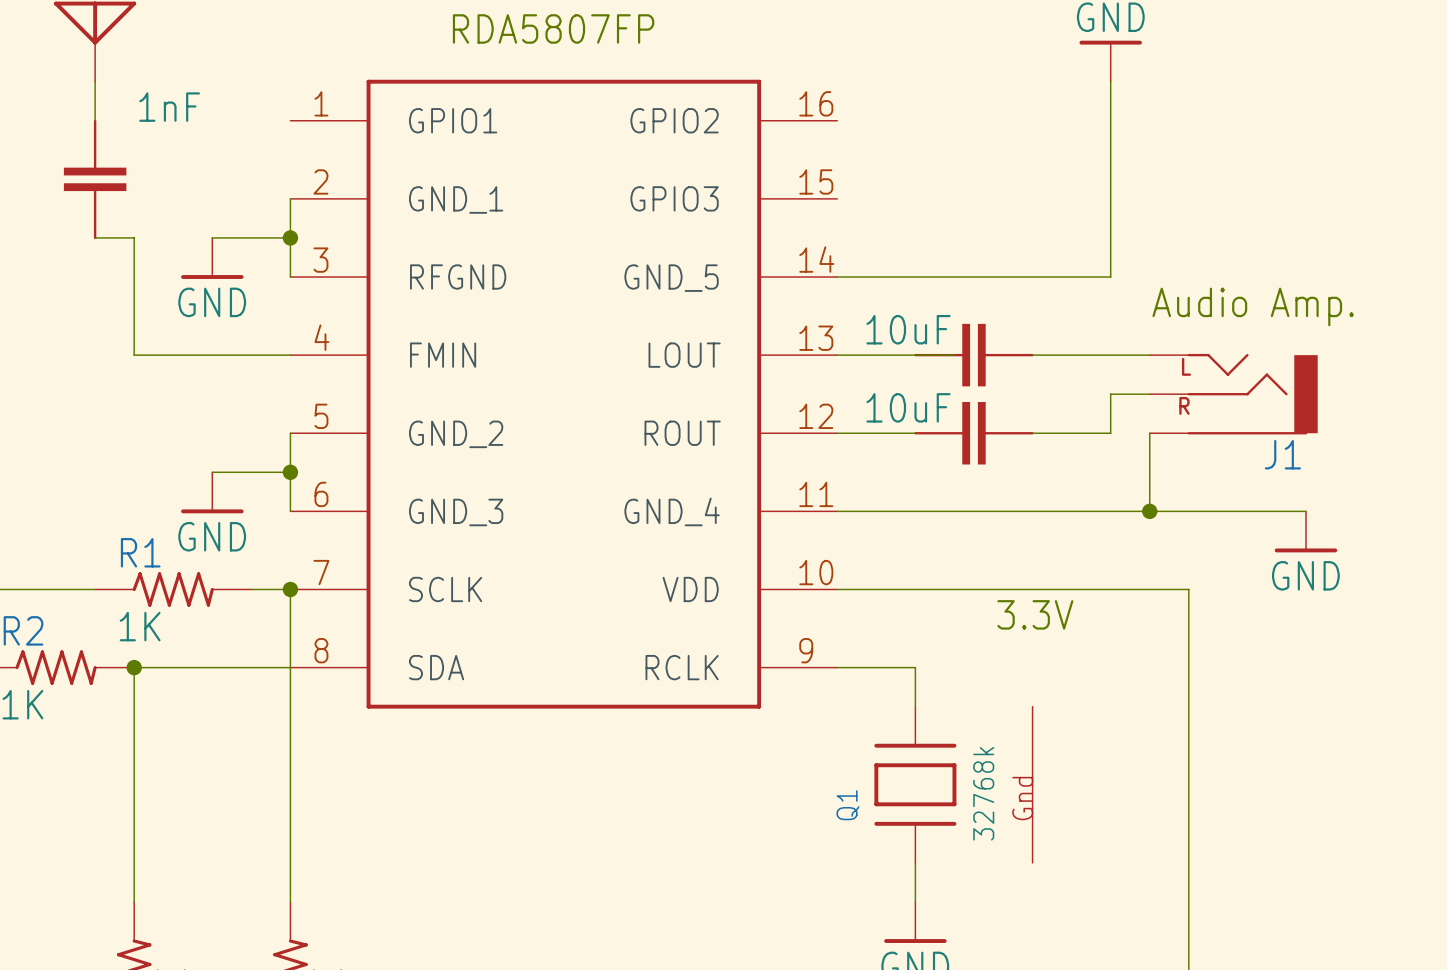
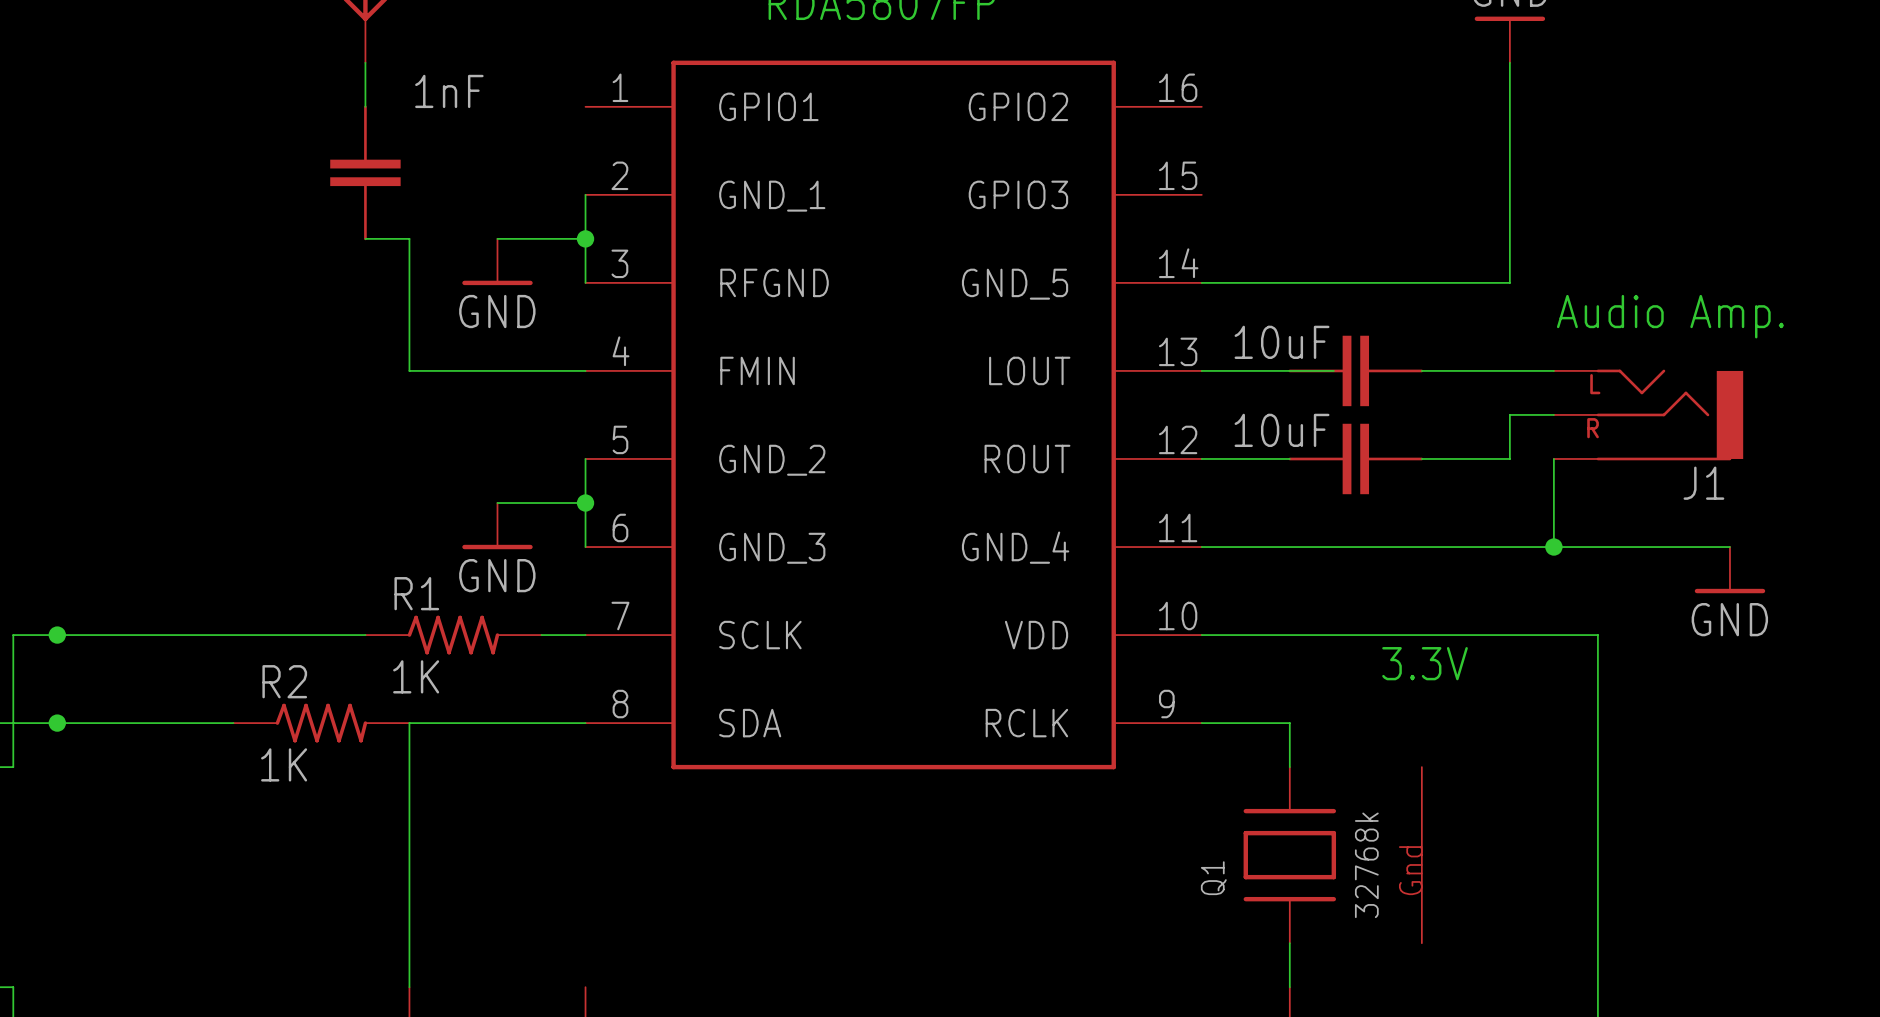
wire: (290, 589) (290, 901) -> none
junction: (290, 589) -> none
junction: (134, 667) -> none

